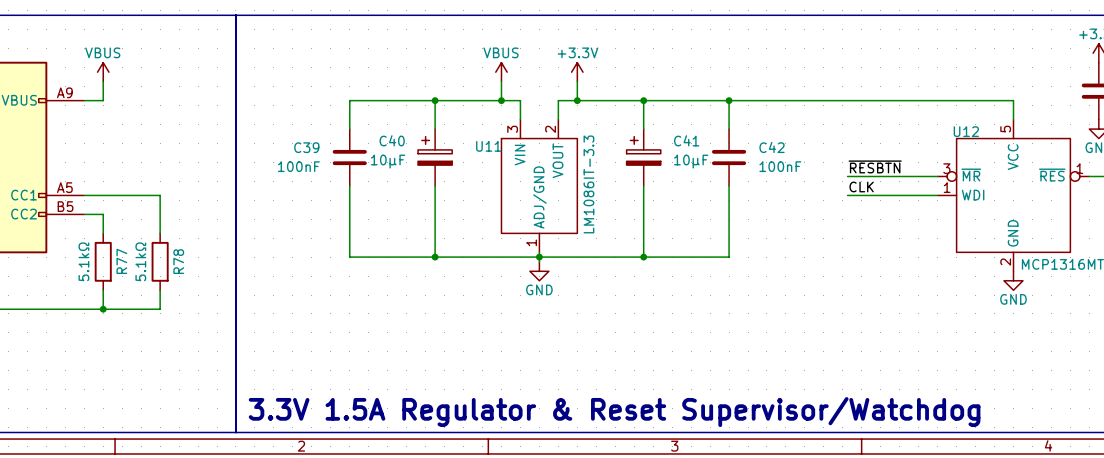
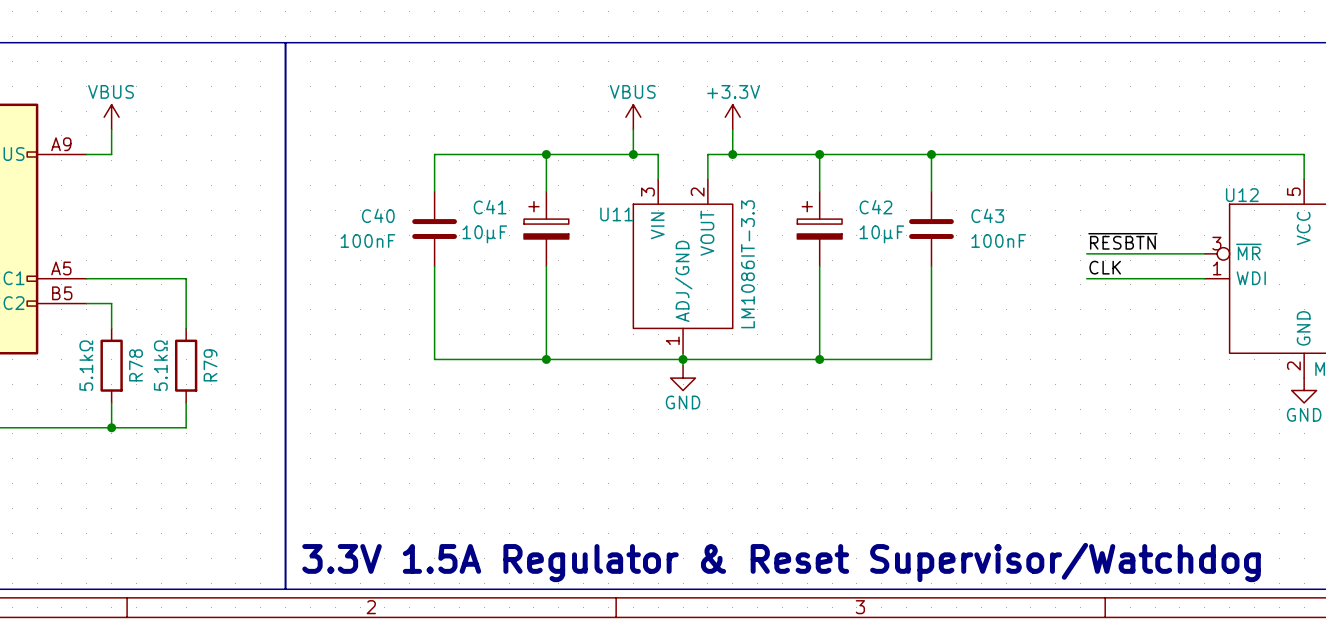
C40 name: C40 (392, 140) -> C41 (490, 207)
C41 name: C41 (686, 140) -> C42 (875, 207)
C39 name: C39 (306, 147) -> C40 (378, 215)
C42 name: C42 (772, 147) -> C43 (987, 215)
R77 name: R77 (121, 261) -> R78 (136, 365)
R78 name: R78 (178, 261) -> R79 (210, 365)

